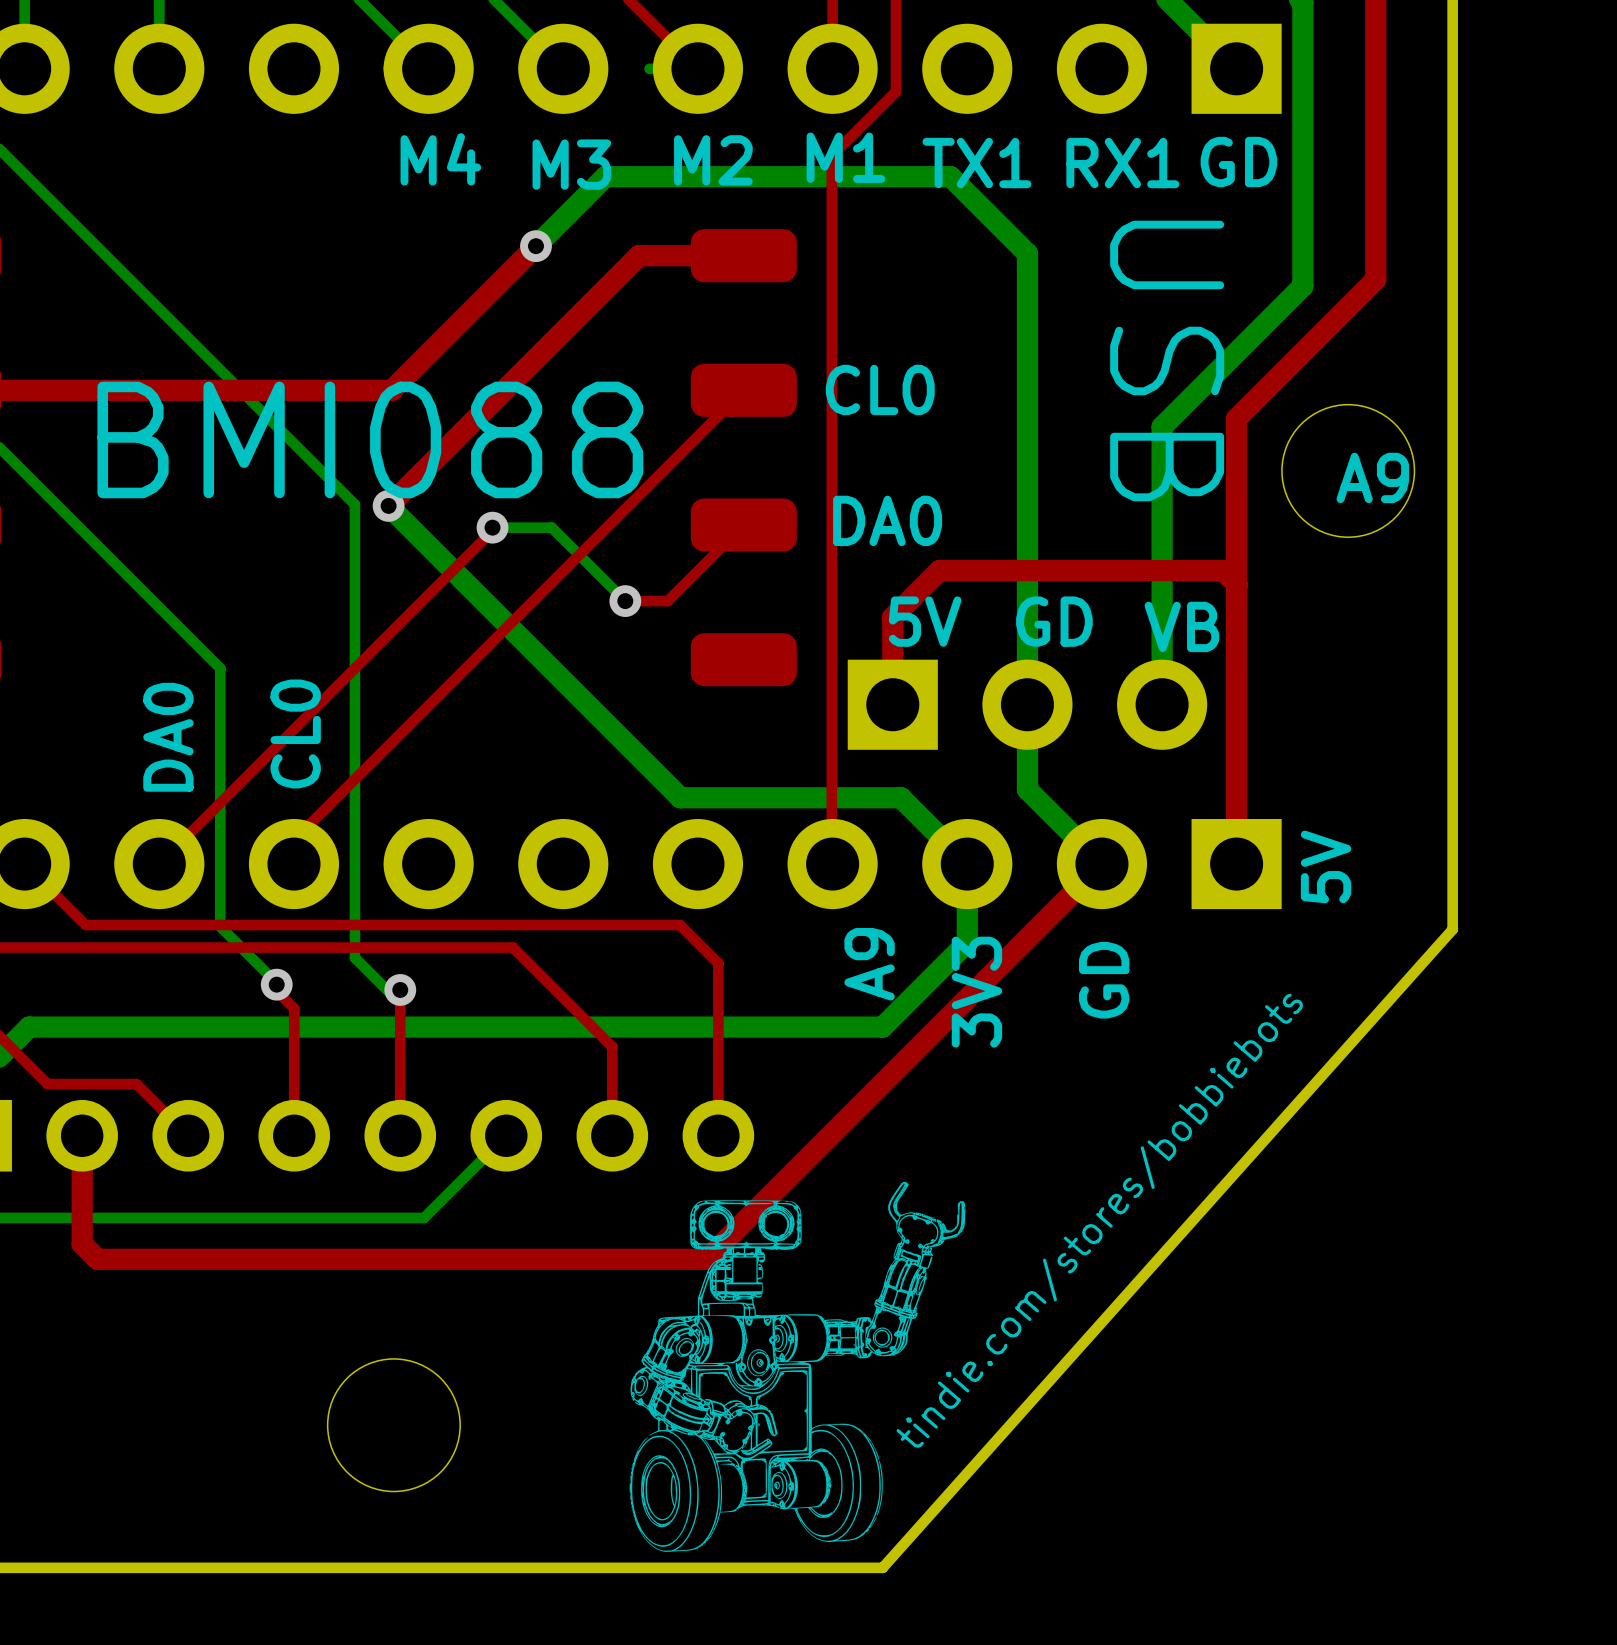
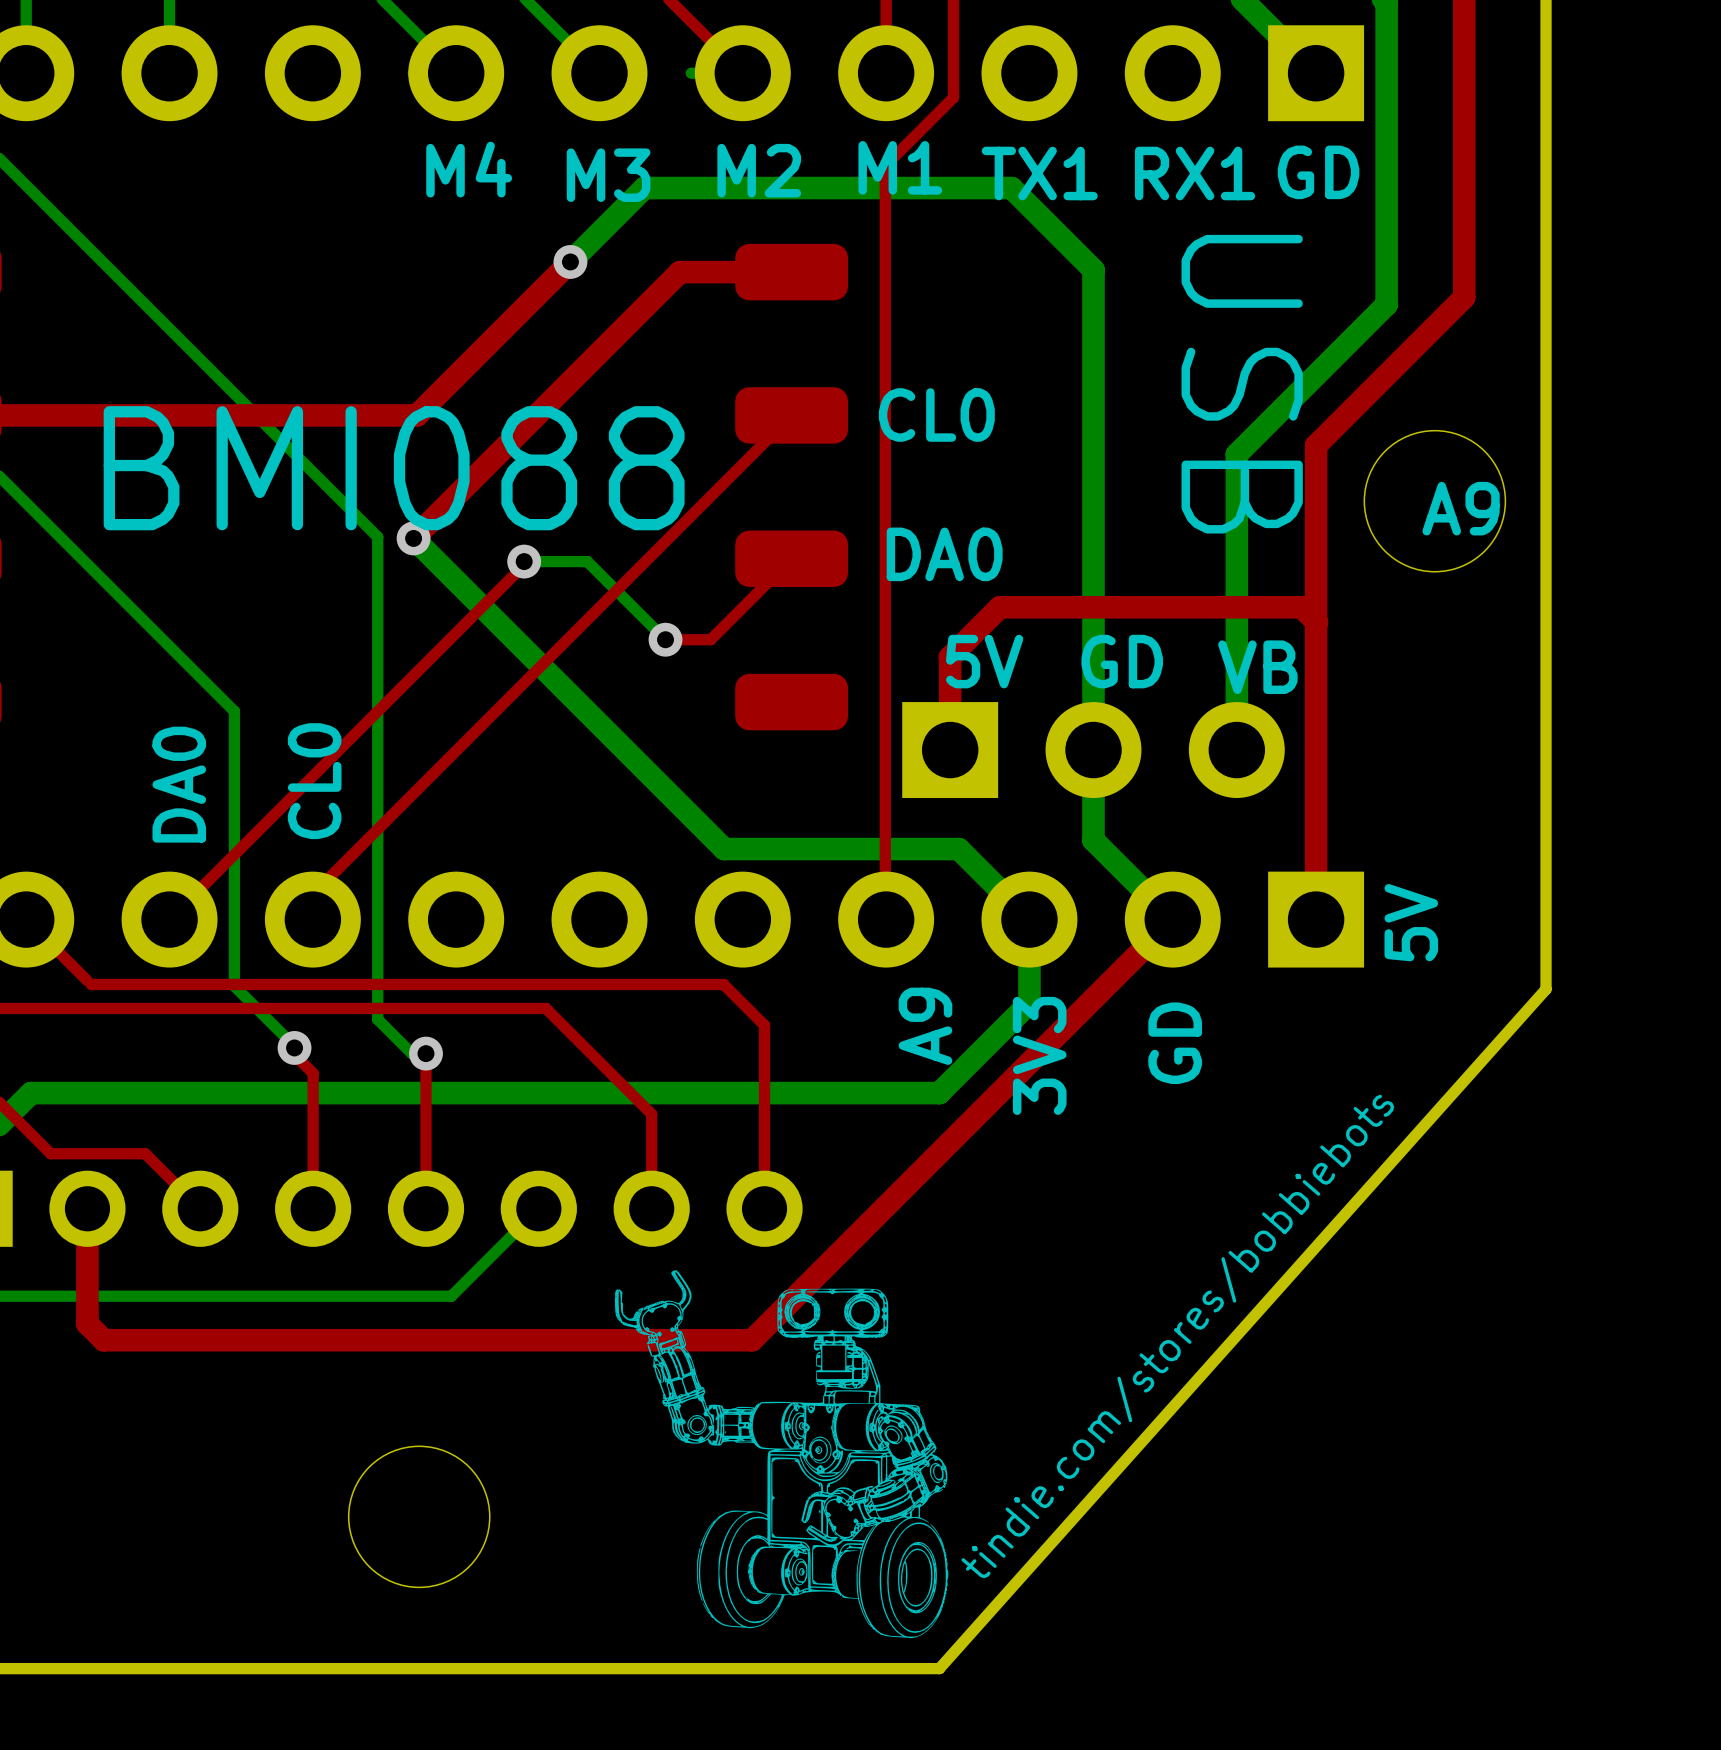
drawing: [629, 1181, 966, 1552] -> none
drawing: none -> [614, 1270, 949, 1639]
text position: tindie.com/stores/bobbiebots (1099, 1220) -> tindie.com/stores/bobbiebots (1177, 1336)

